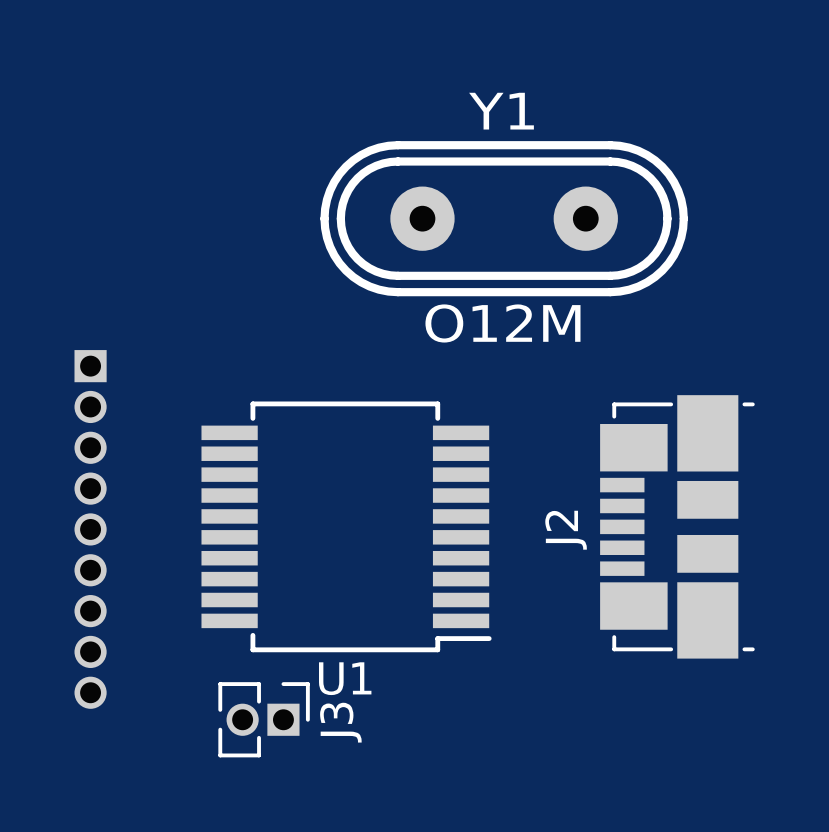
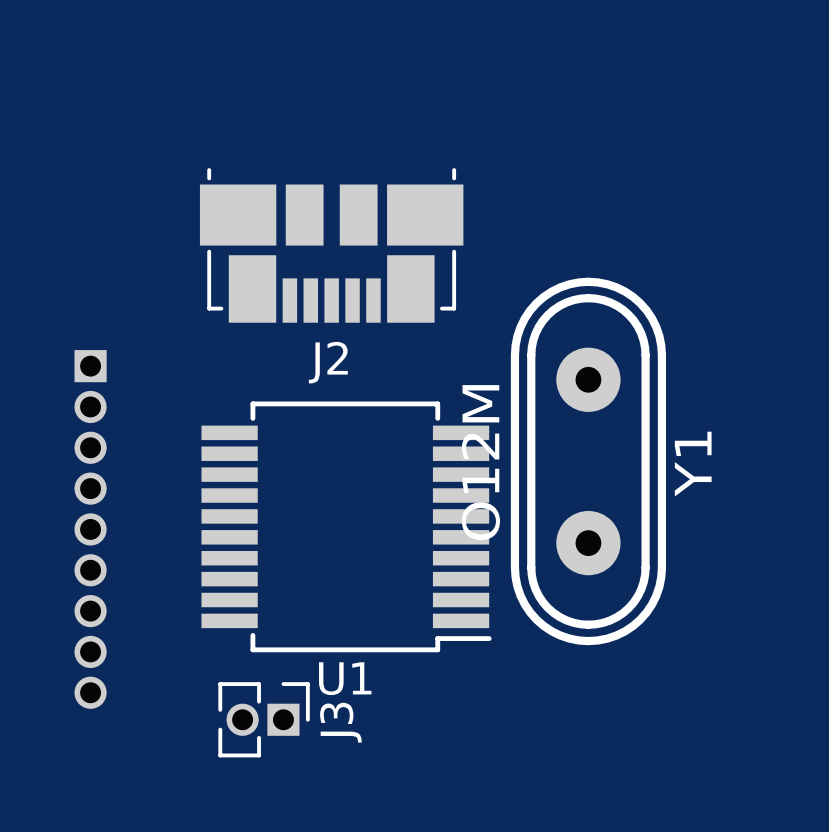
Y1 rotation: 0° (504, 218) -> 90° clockwise (588, 461)
Y1 position: (504, 218) -> (588, 461)
J2 rotation: 0° (677, 526) -> 90° counterclockwise (331, 245)
J2 position: (677, 526) -> (331, 245)

